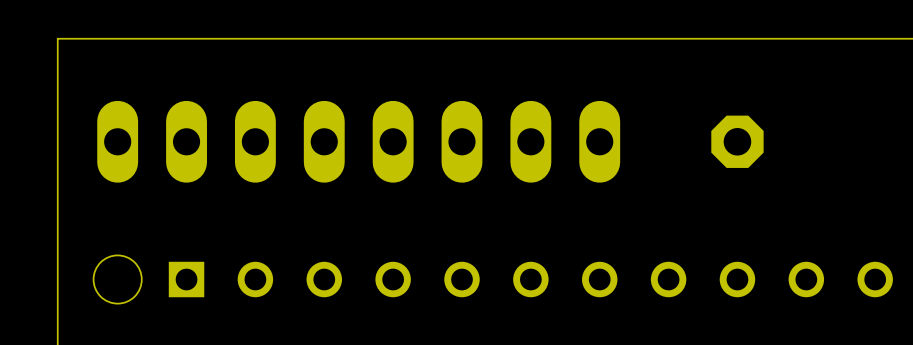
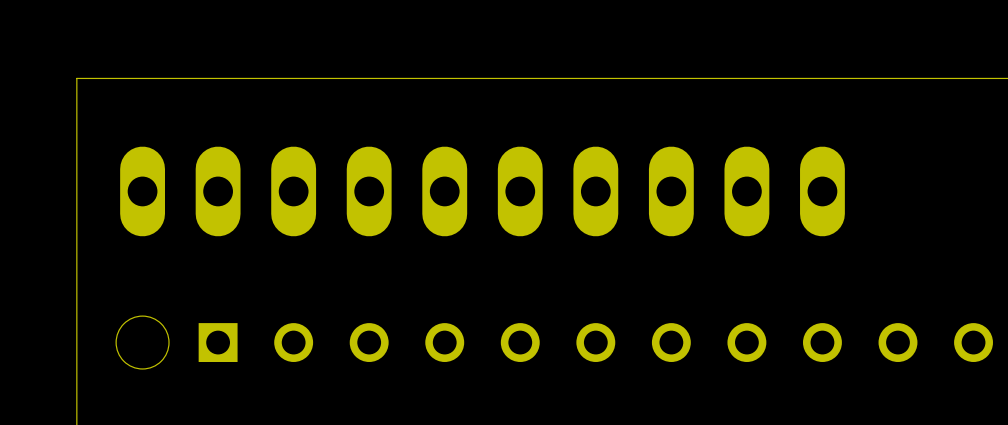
part: none -> (784, 191)
part: (737, 141) -> none

